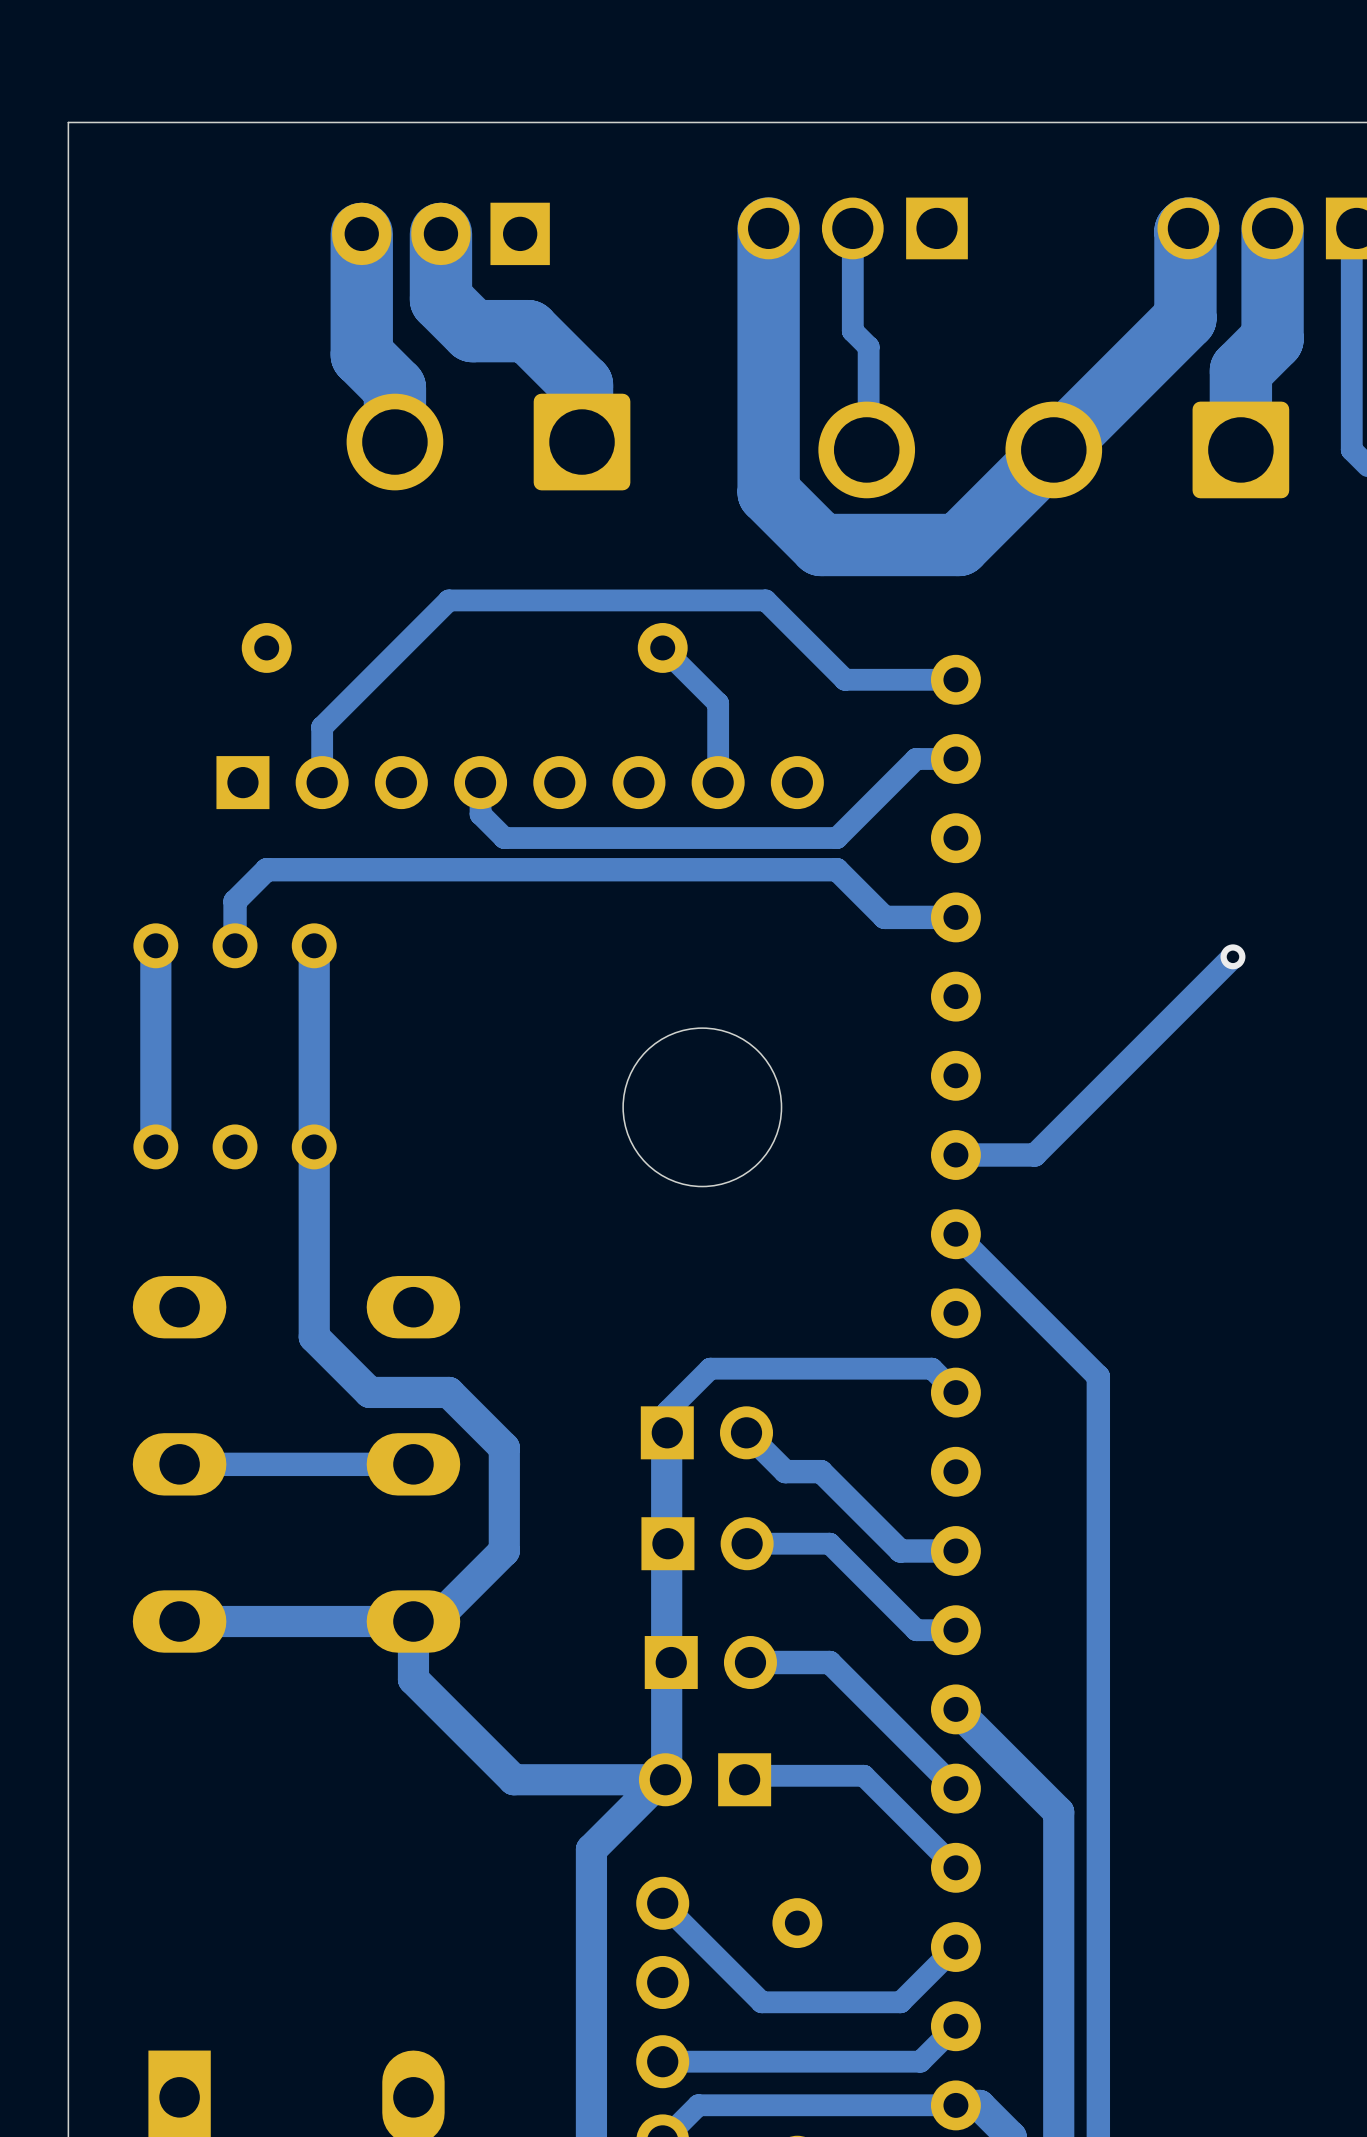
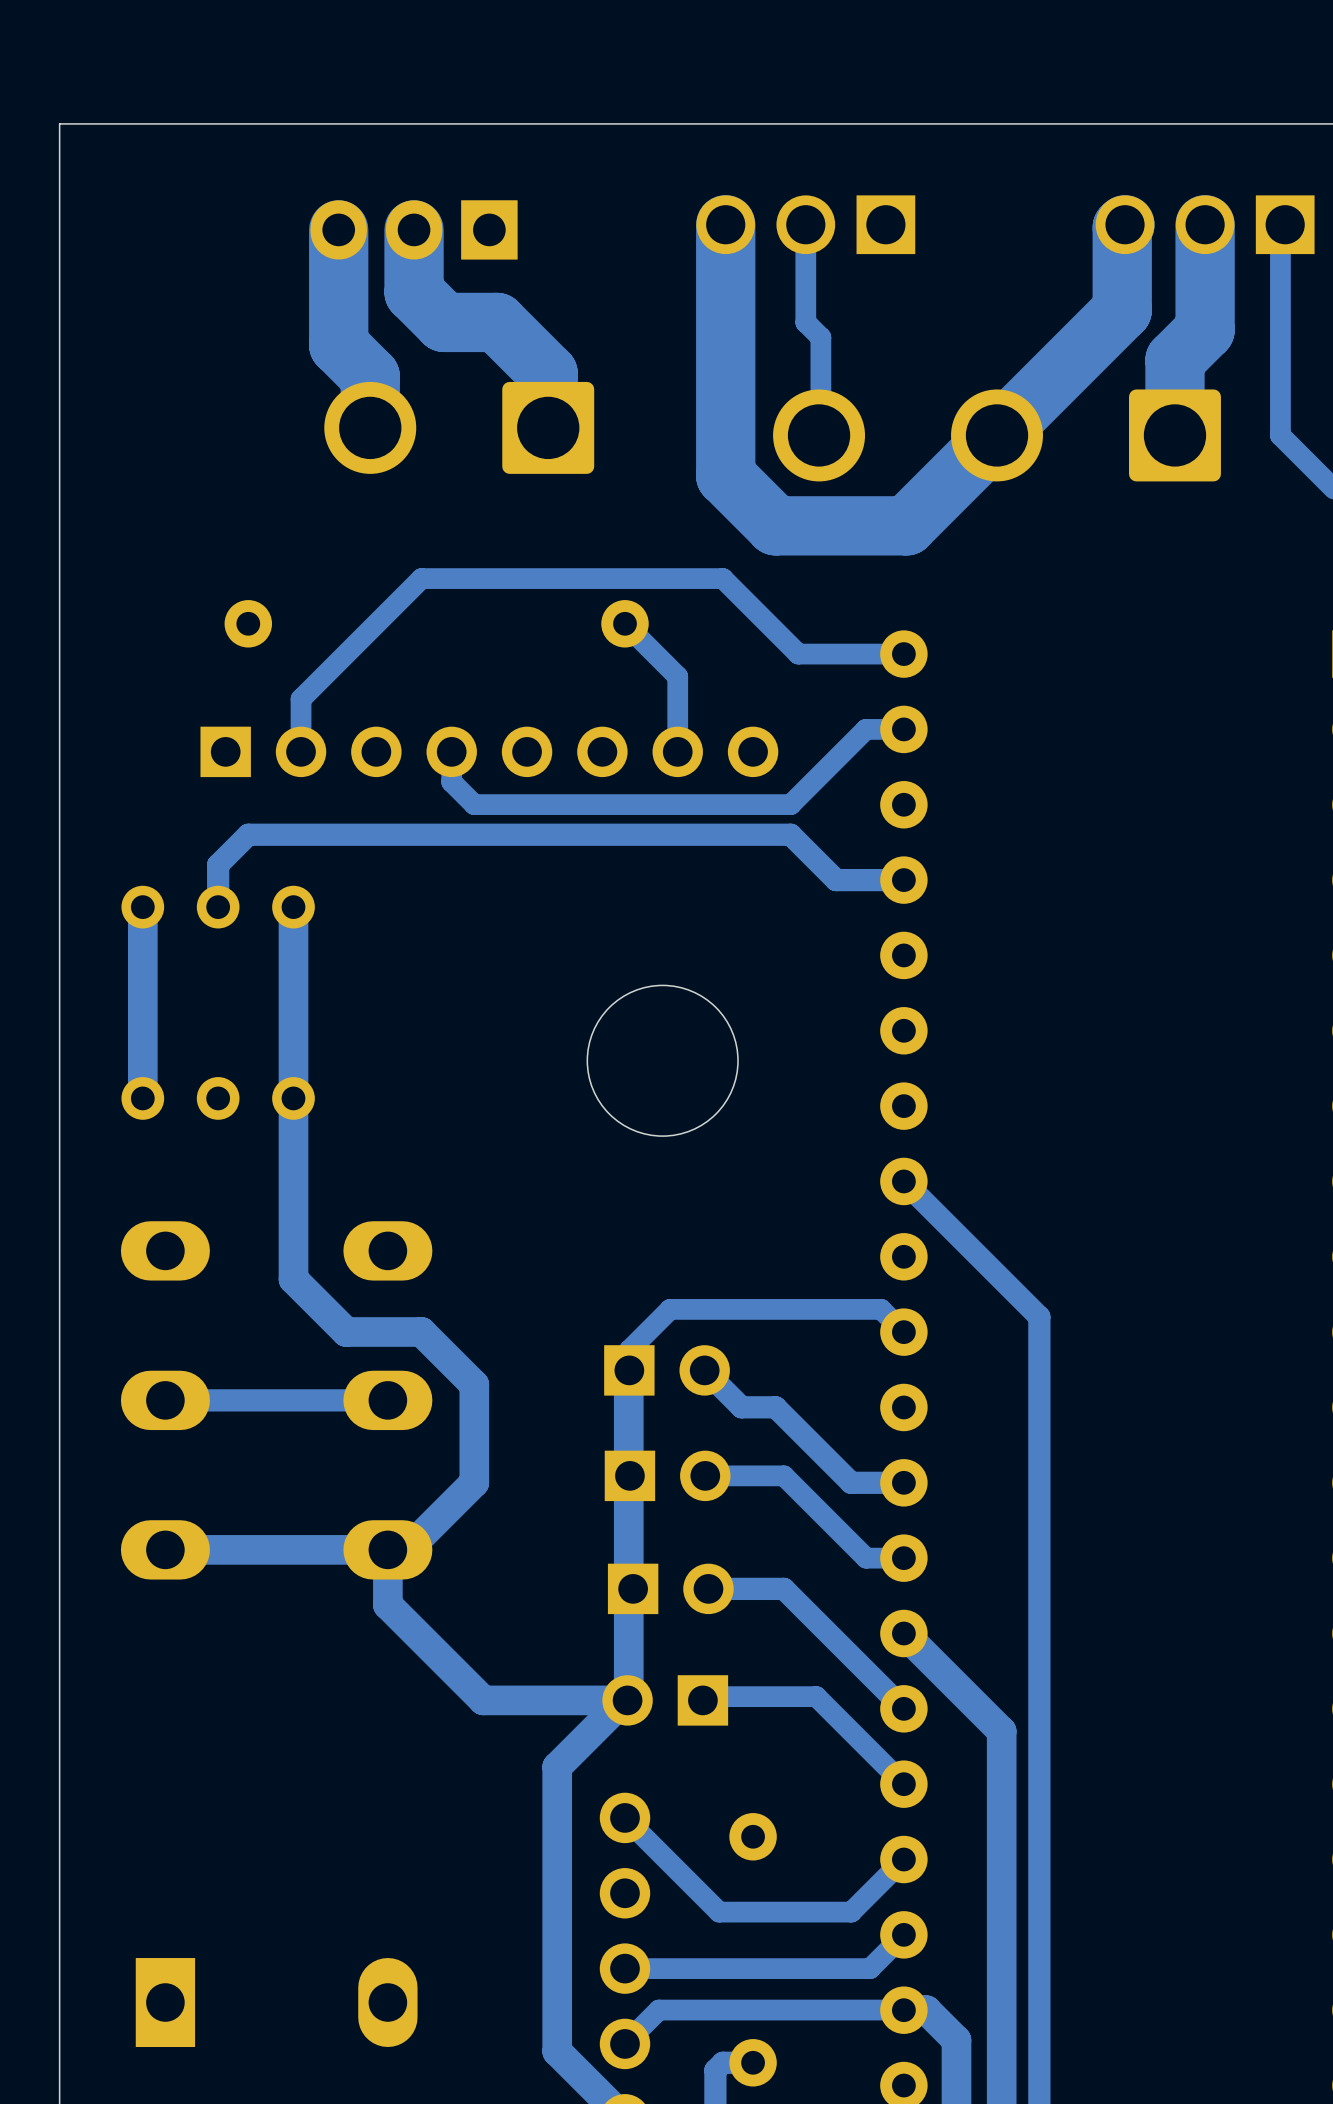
track: (1232, 956) (1034, 1155) (955, 1155) -> none
via: (1232, 956) -> none

